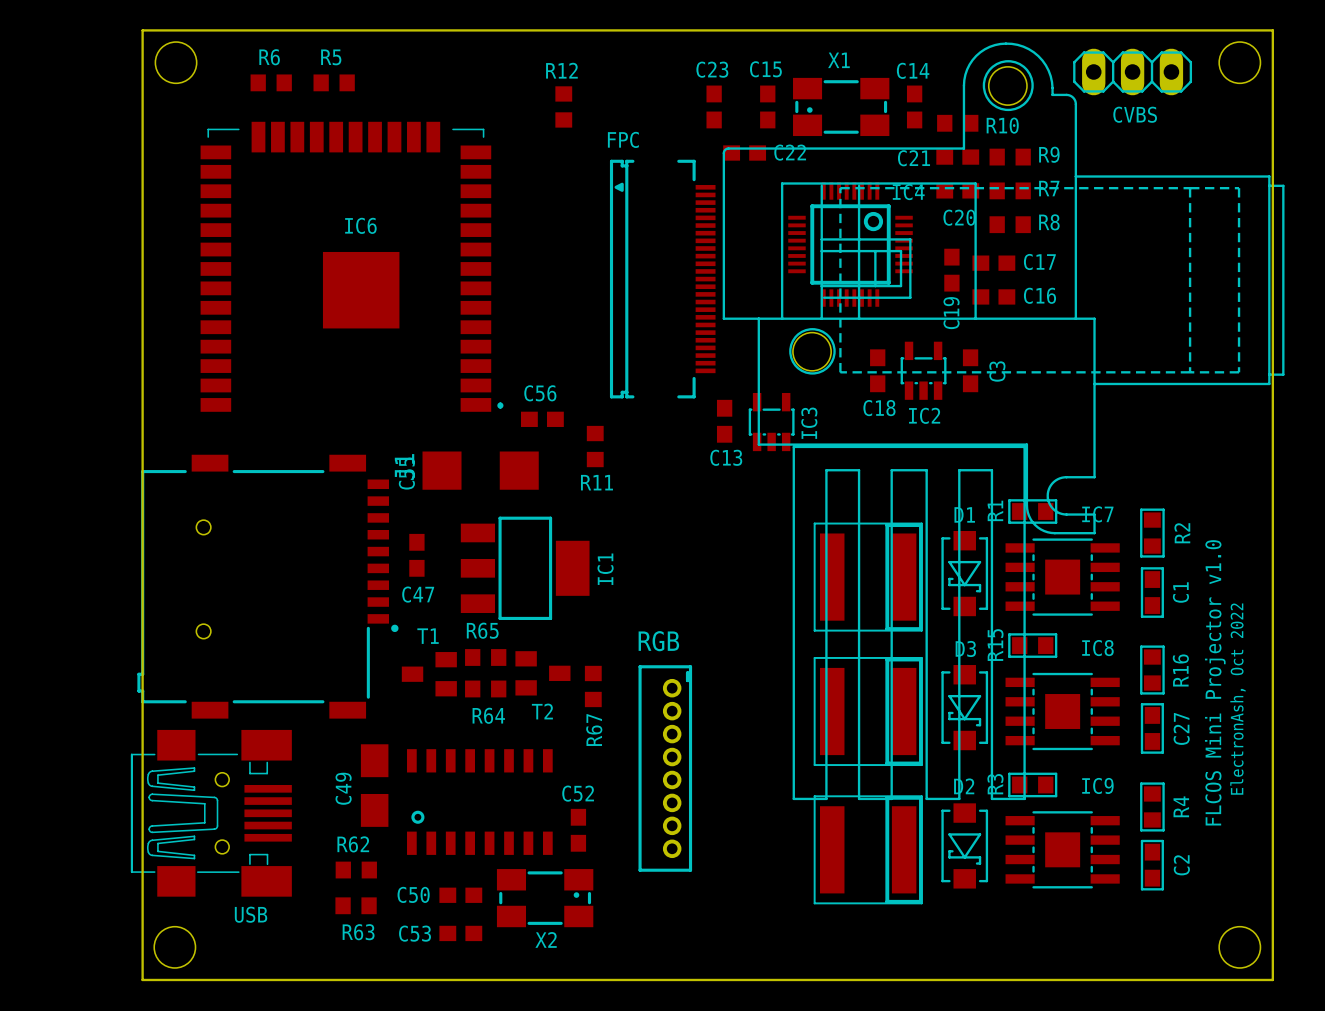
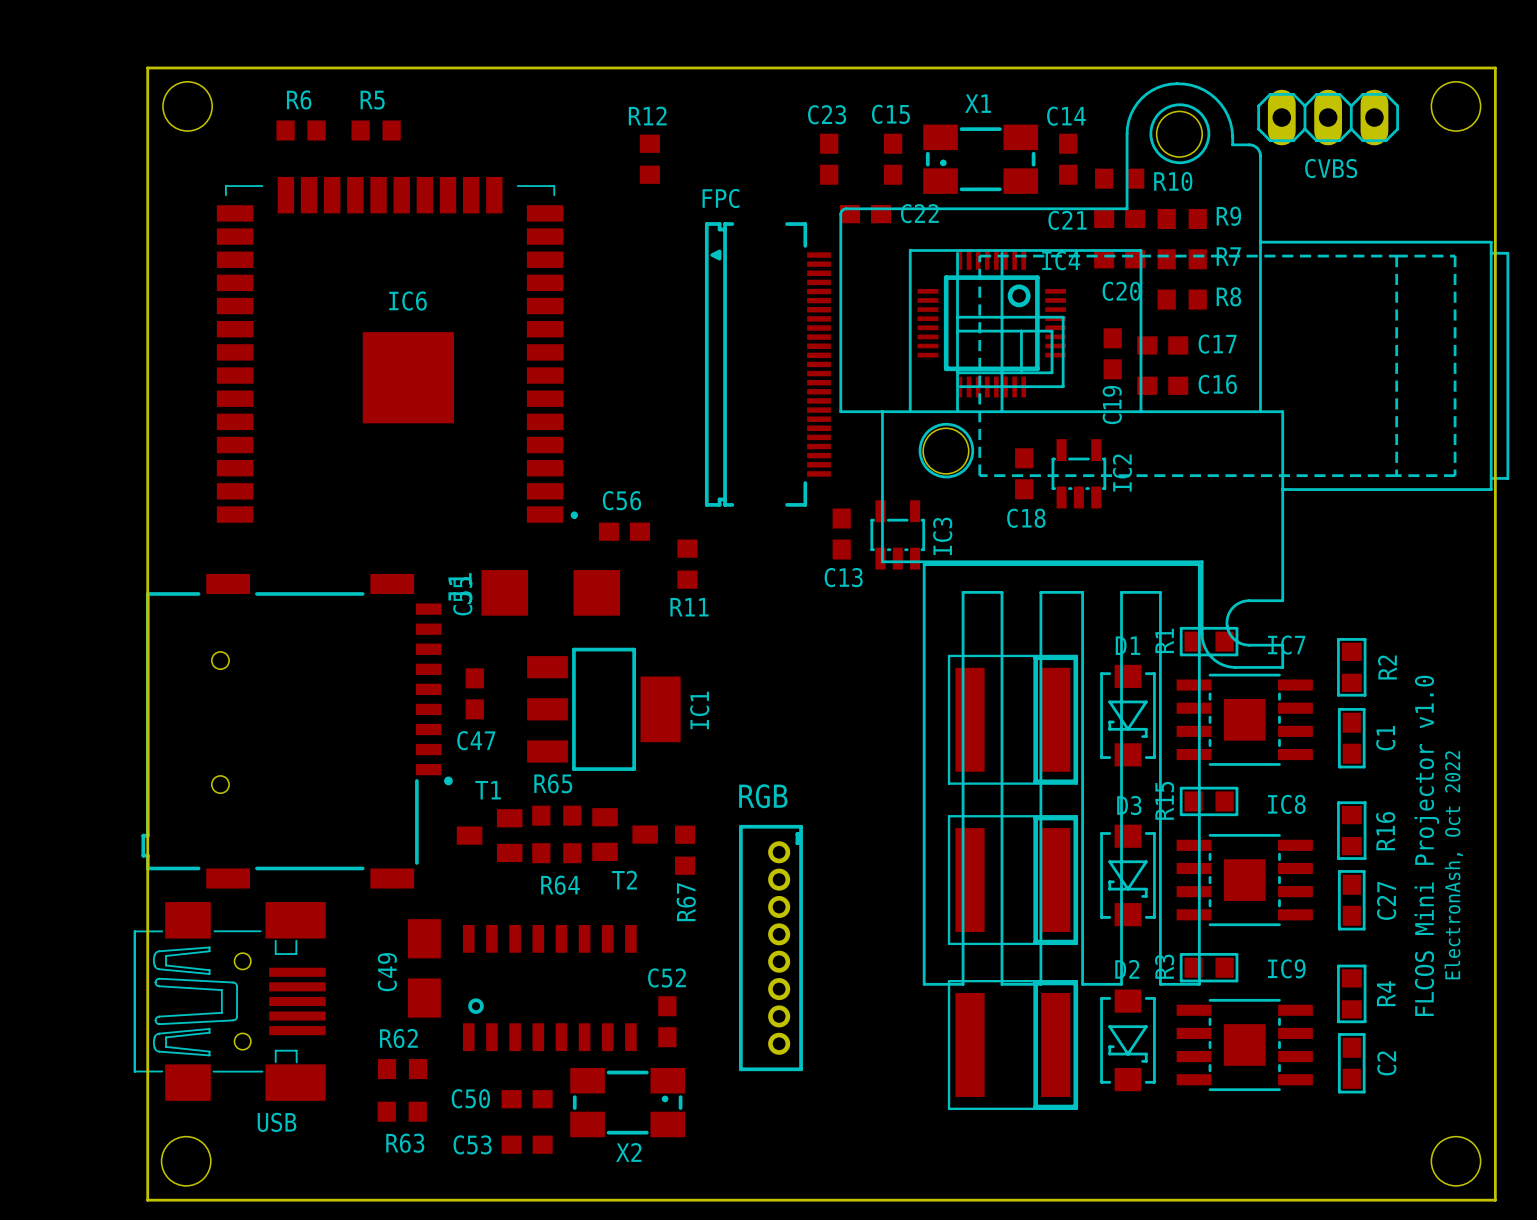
C3: (970, 370) -> none
IC2 name rotation: 0° (924, 415) -> 90° counterclockwise (1122, 472)
IC2 name position: IC2 (924, 415) -> IC2 (1122, 472)

